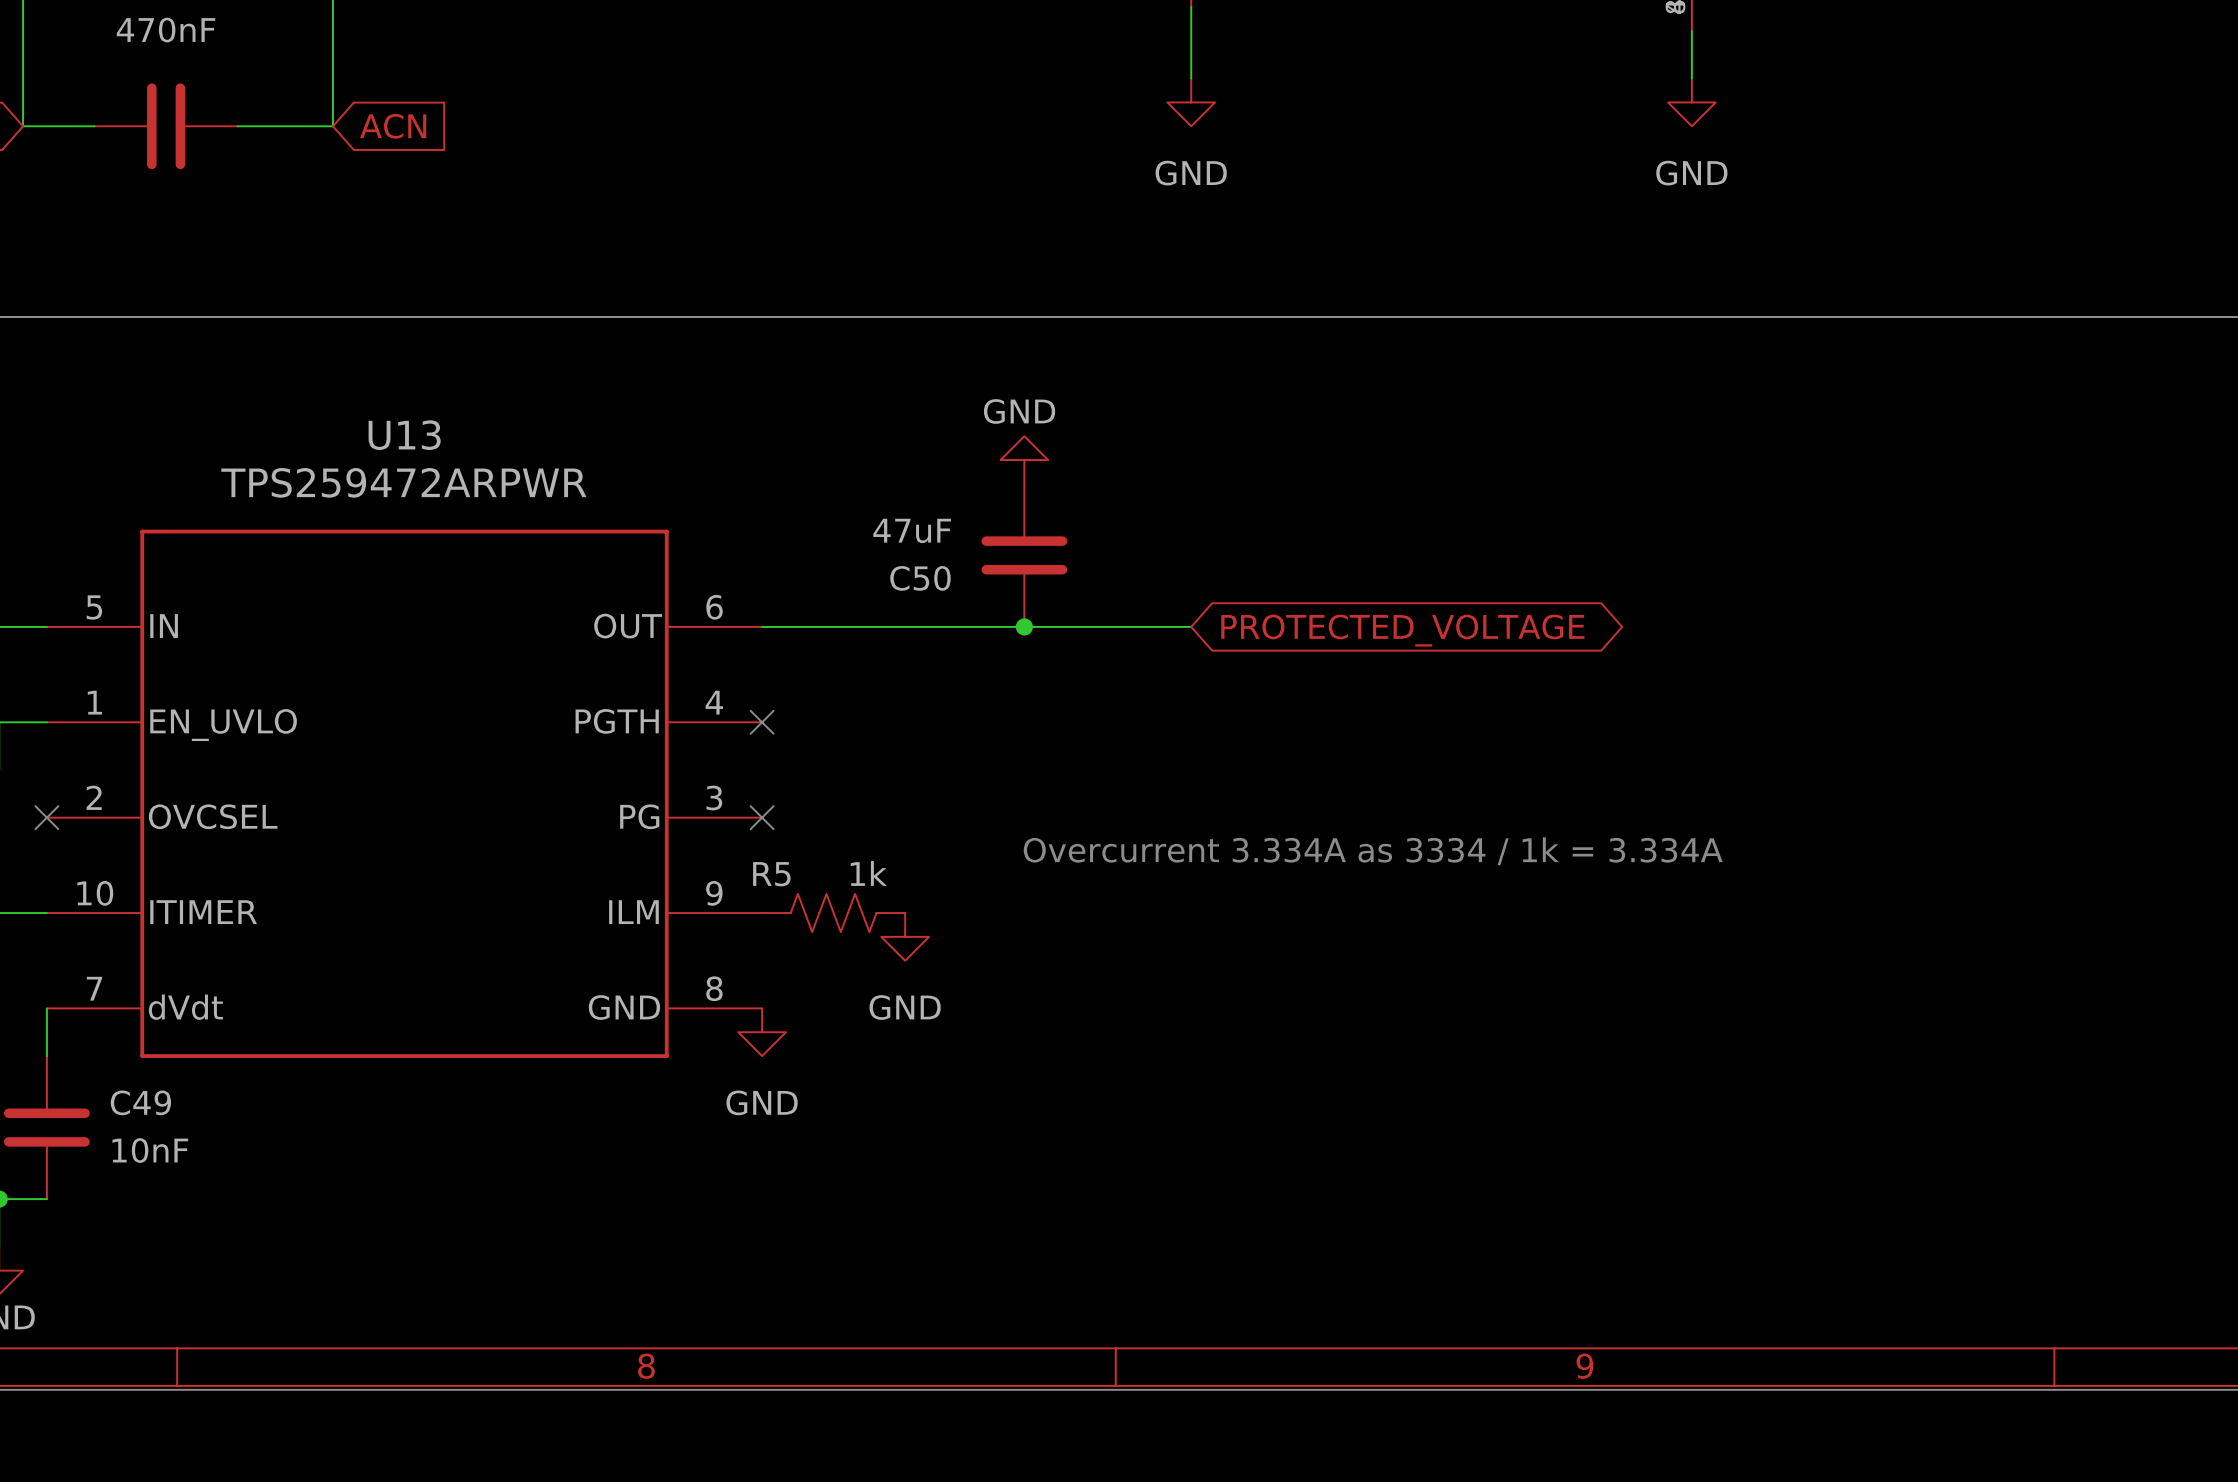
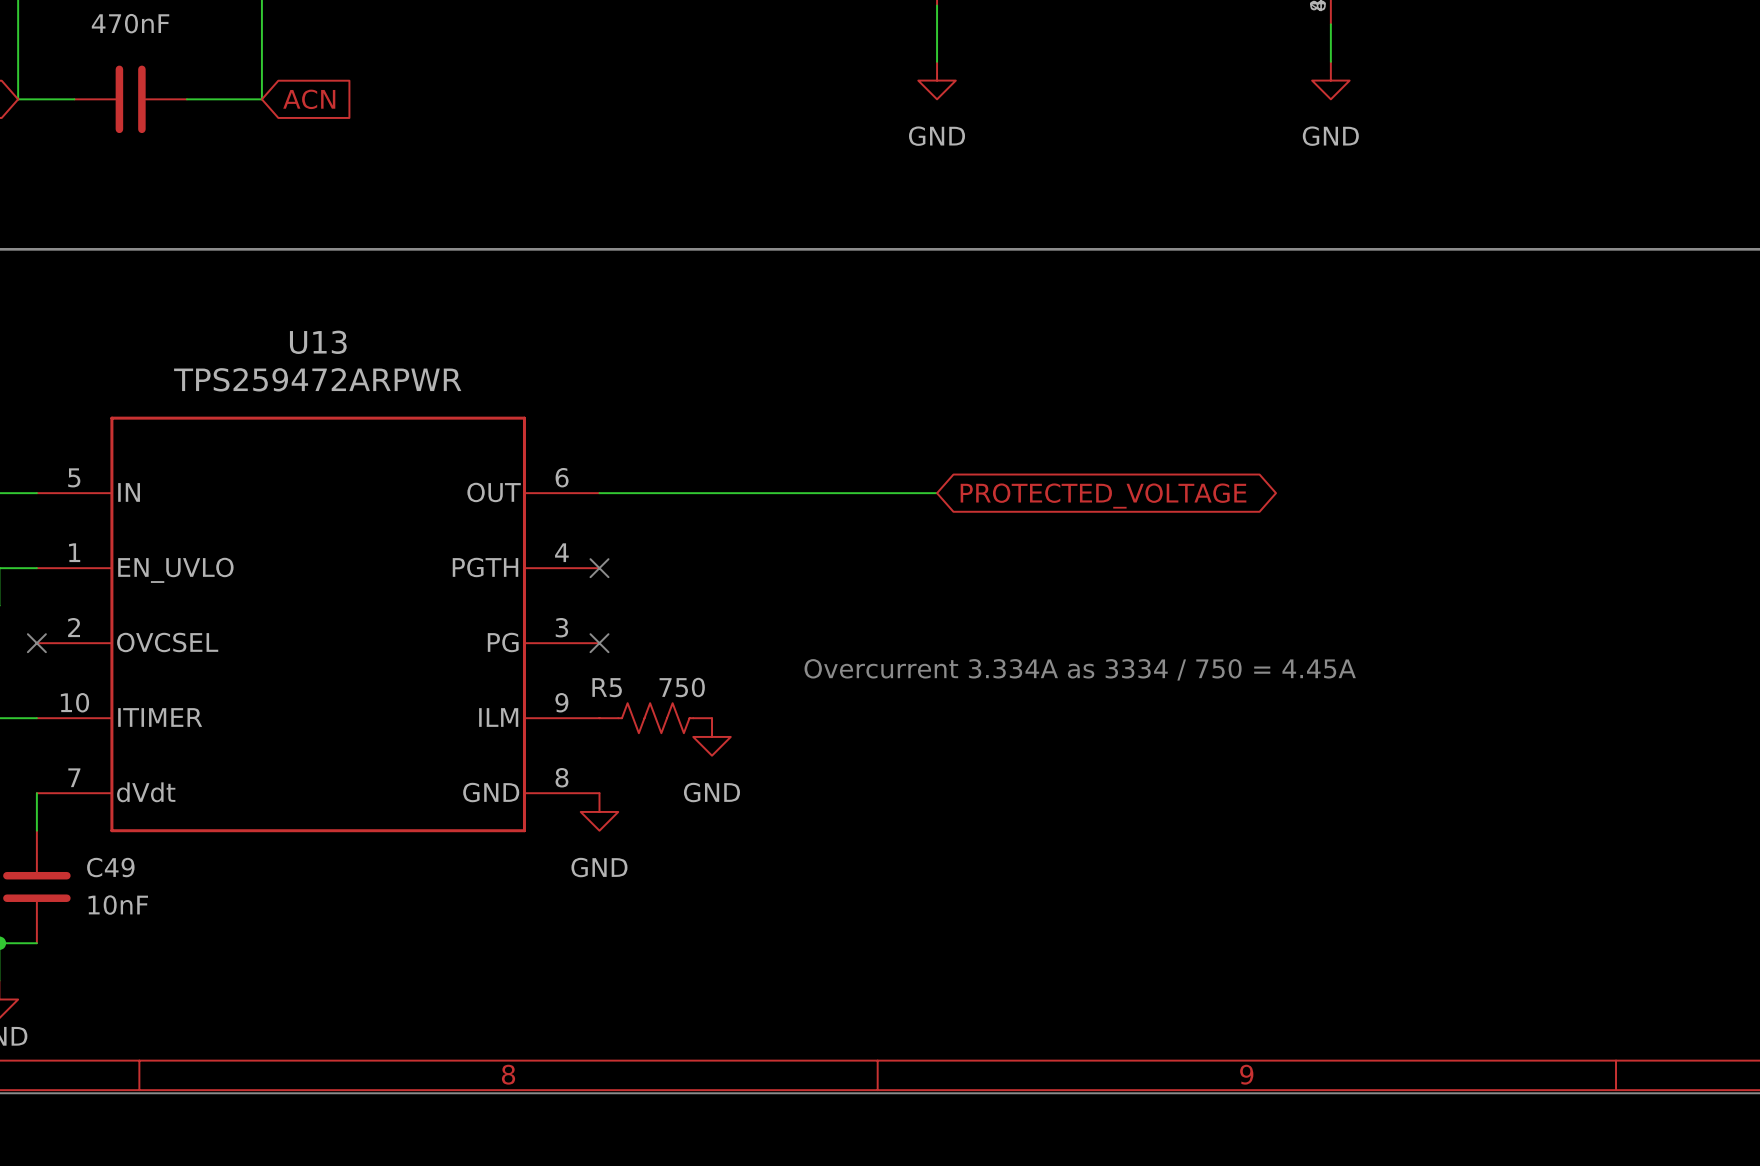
power symbol: GND (1024, 460) -> none
C50: 47uF (1024, 555) -> none
junction: (1024, 626) -> none
text: Overcurrent 3.334A as 3334 / 1k = 3.334A (1373, 851) -> Overcurrent 3.334A as 3334 / 750 = 4.45A (1080, 669)
R5 value: 1k (868, 873) -> 750 (682, 687)

